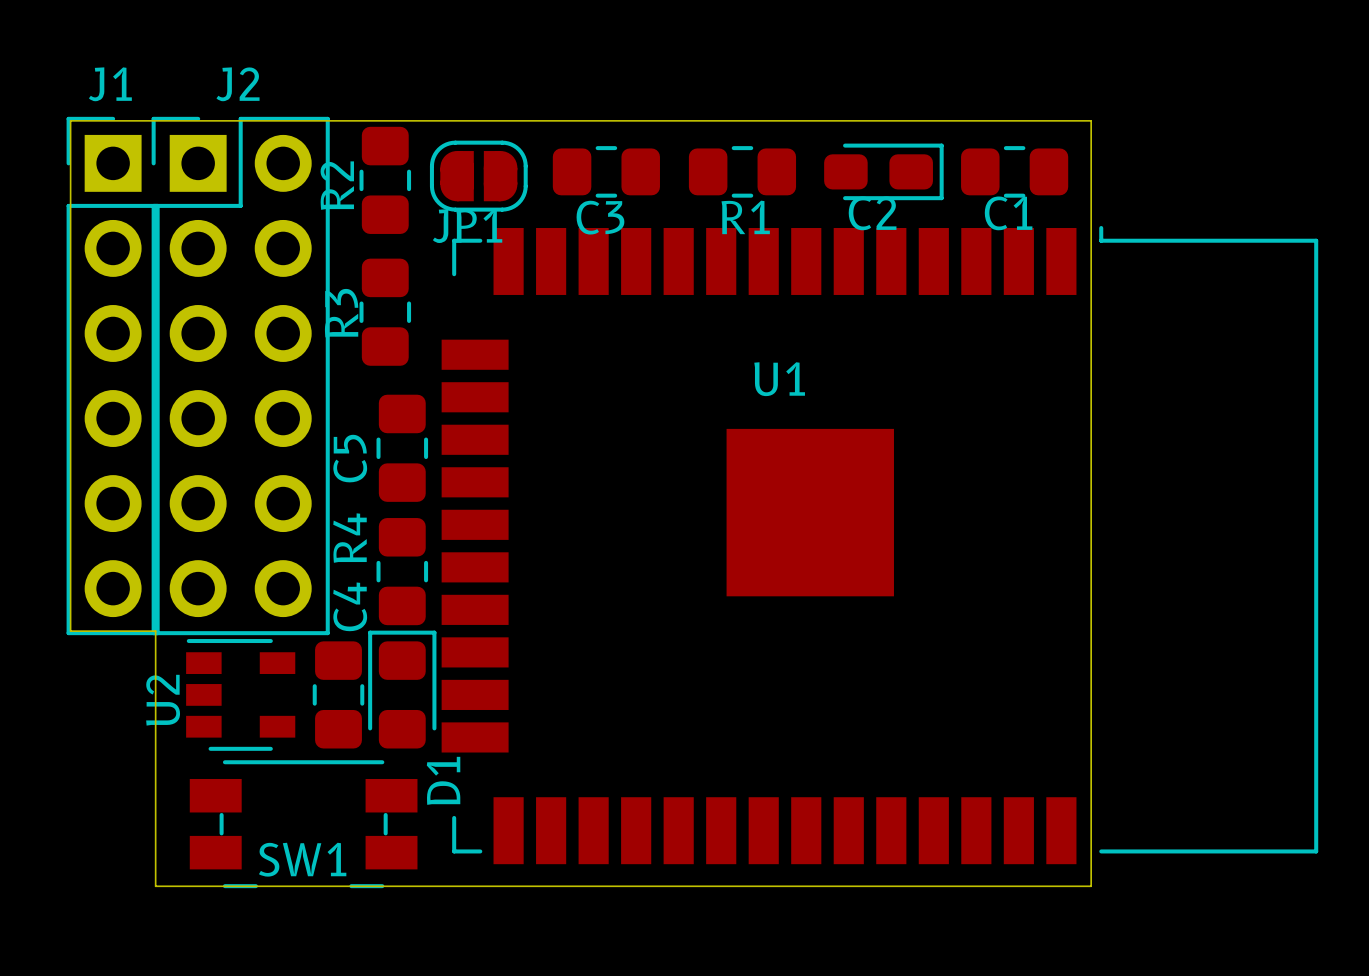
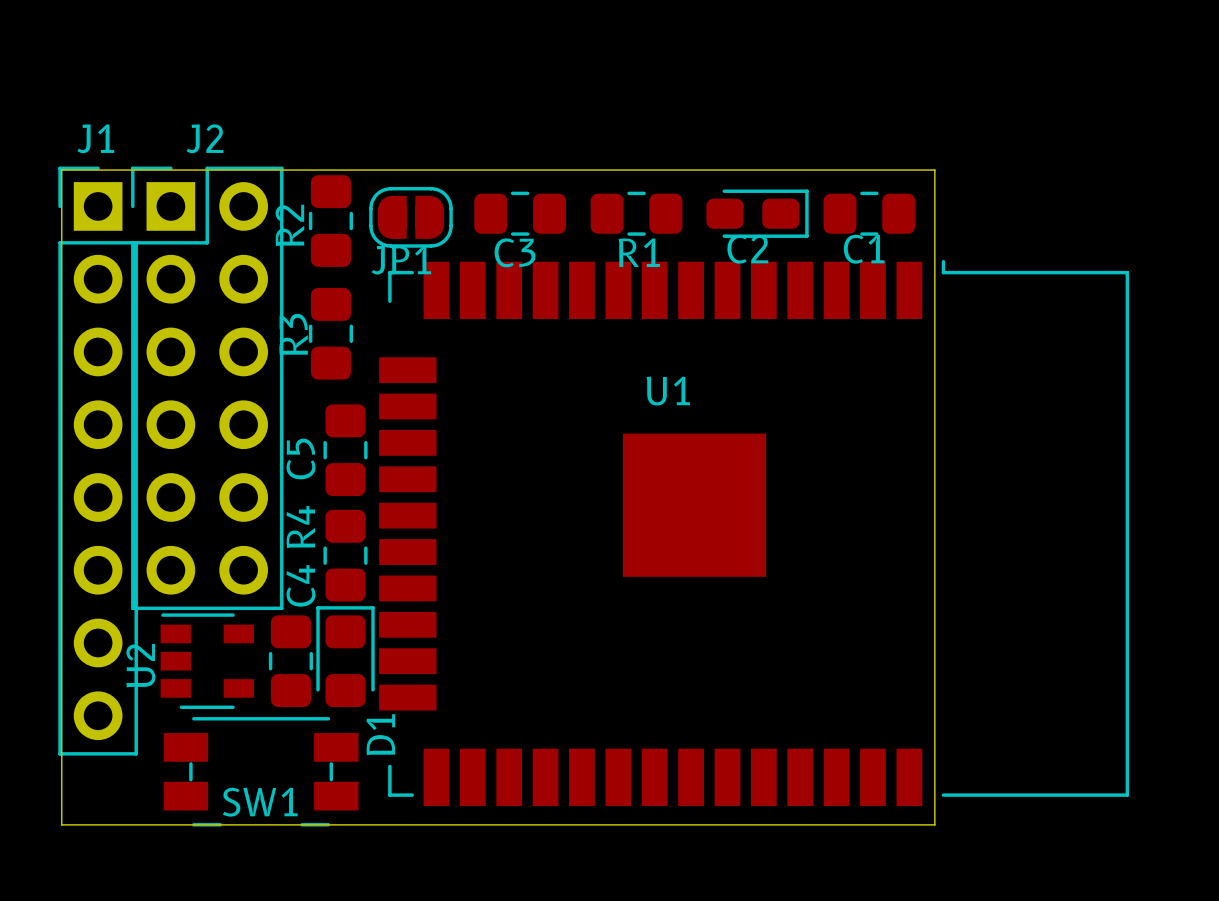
J1 footprint: [66, 116, 160, 636] -> [58, 166, 138, 756]
board edge: (70, 631) (155, 631) (155, 886) -> (61, 606) (61, 824) (134, 824)

